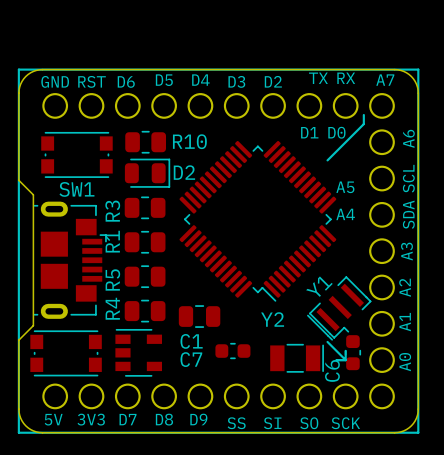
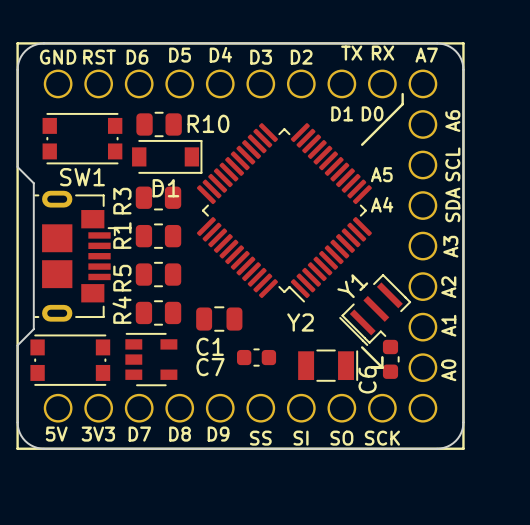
D1: none -> (167, 156)
D2: (147, 173) -> none

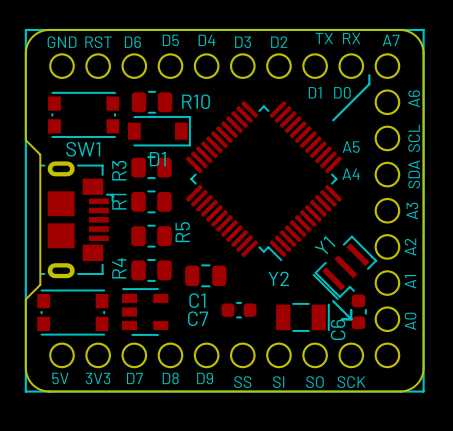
R5 name position: R5 (122, 278) -> R5 (182, 232)

